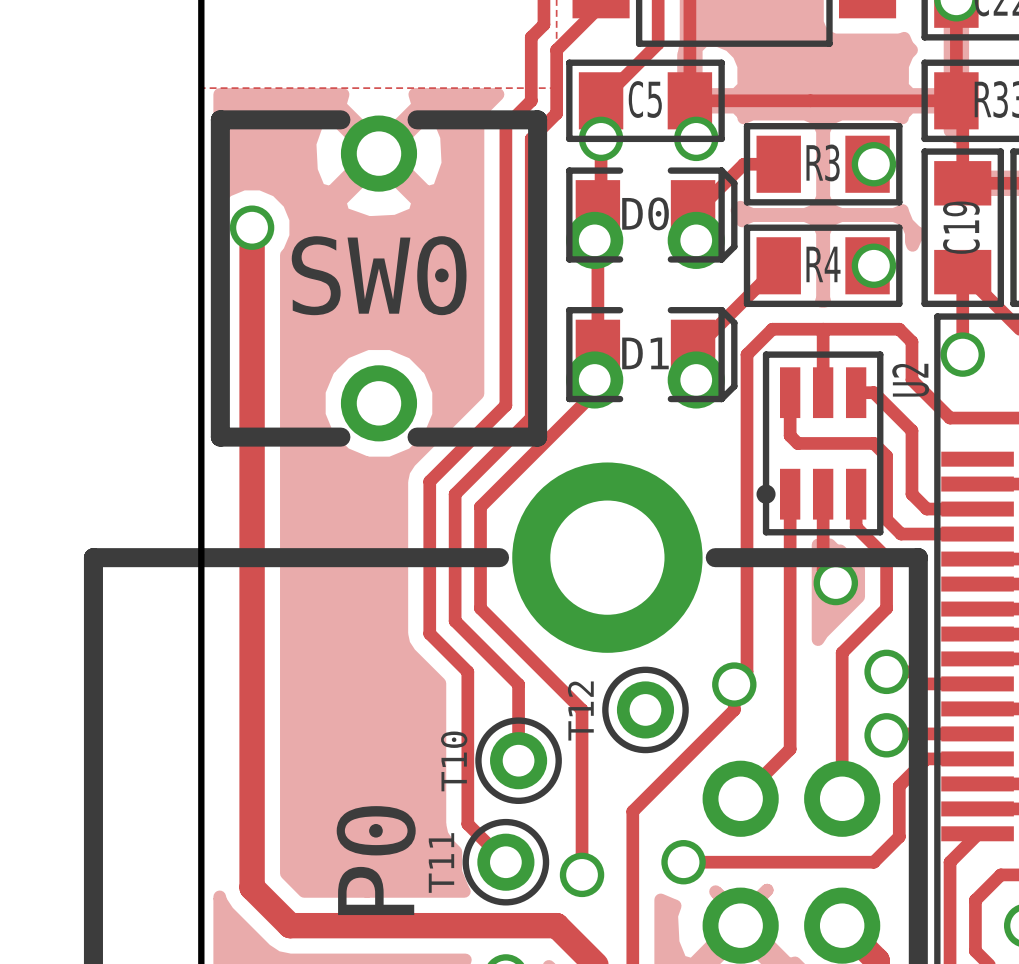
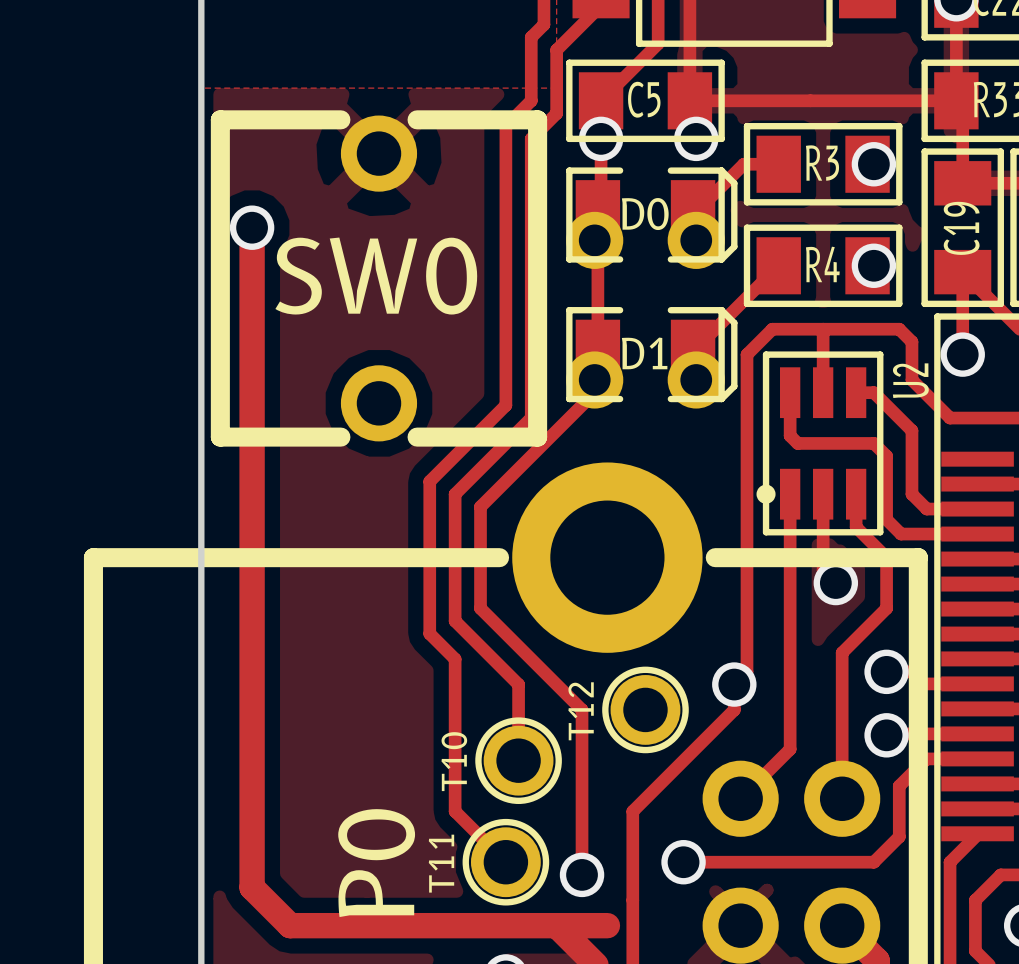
track: (455, 659) (467, 671) (467, 824) -> (455, 659) (455, 811) (467, 824)
T12 footprint: [602, 666, 689, 754] -> [602, 666, 689, 754]
T10 footprint: [475, 717, 562, 804] -> [475, 717, 562, 804]
T11 footprint: [462, 818, 550, 906] -> [462, 818, 550, 906]
track: none -> (556, 925) (607, 925)

